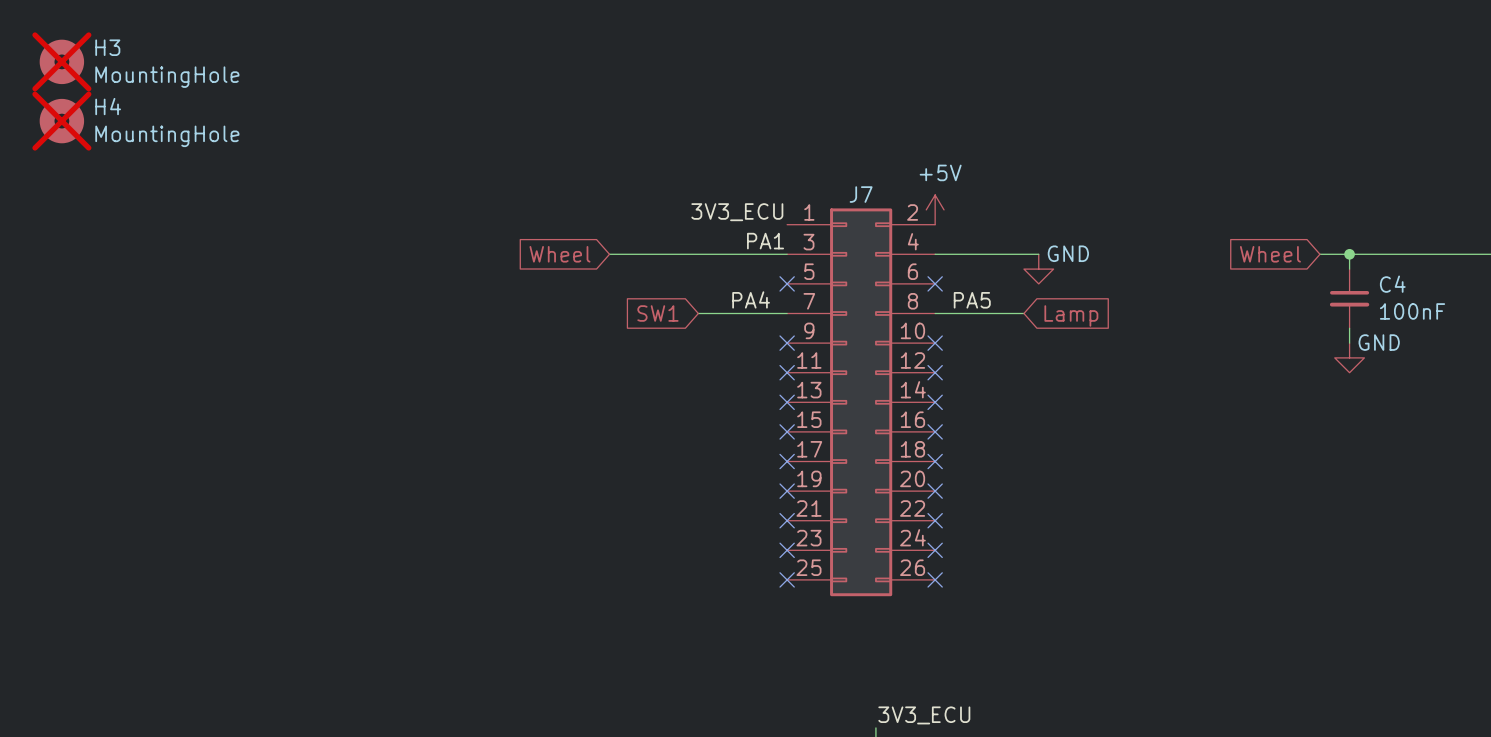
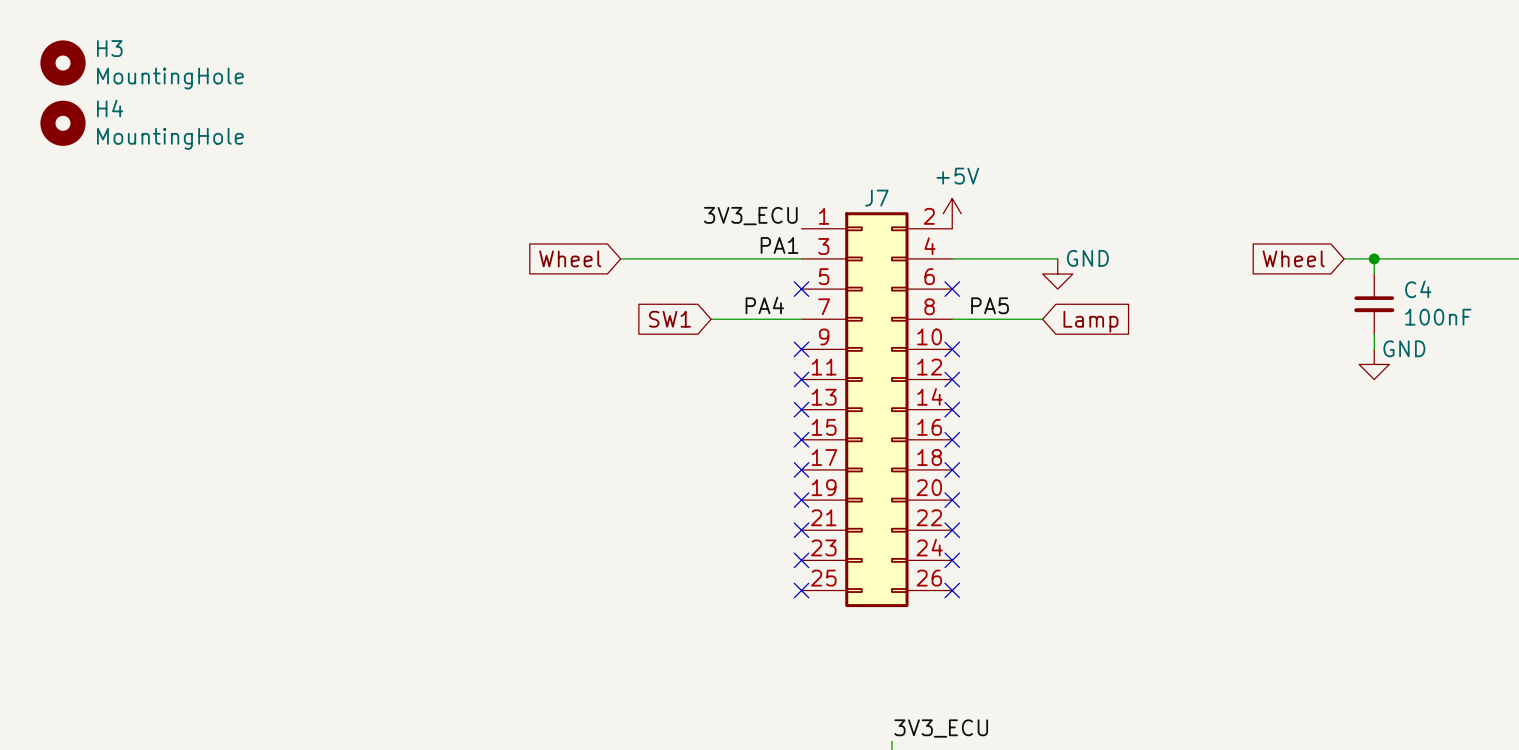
H3 do-not-place cross: (61, 61) -> none
H4 do-not-place cross: (61, 121) -> none

